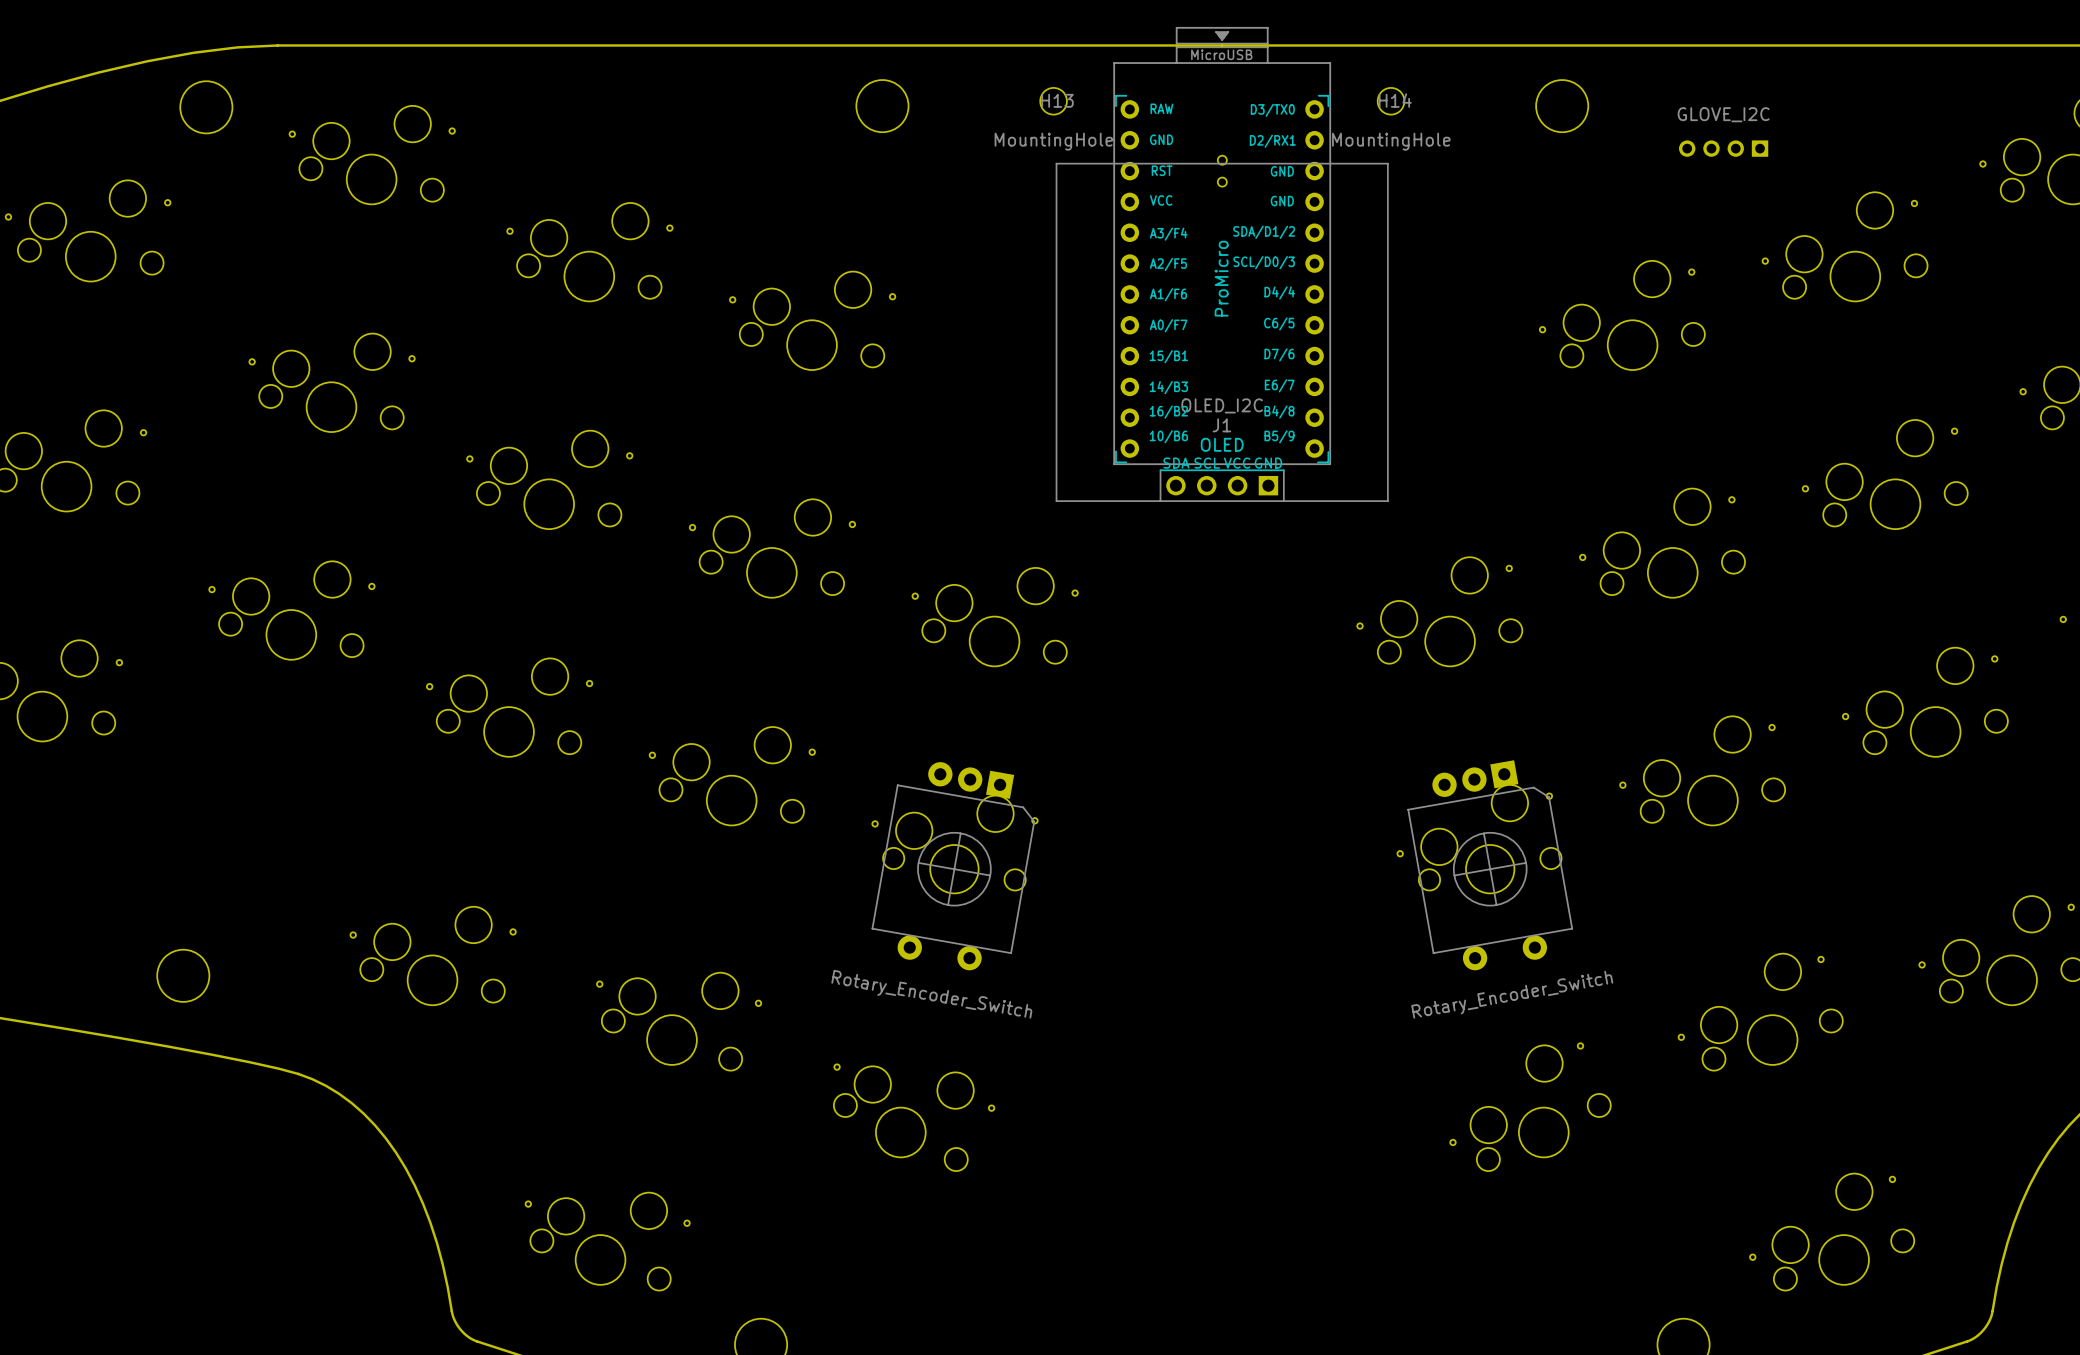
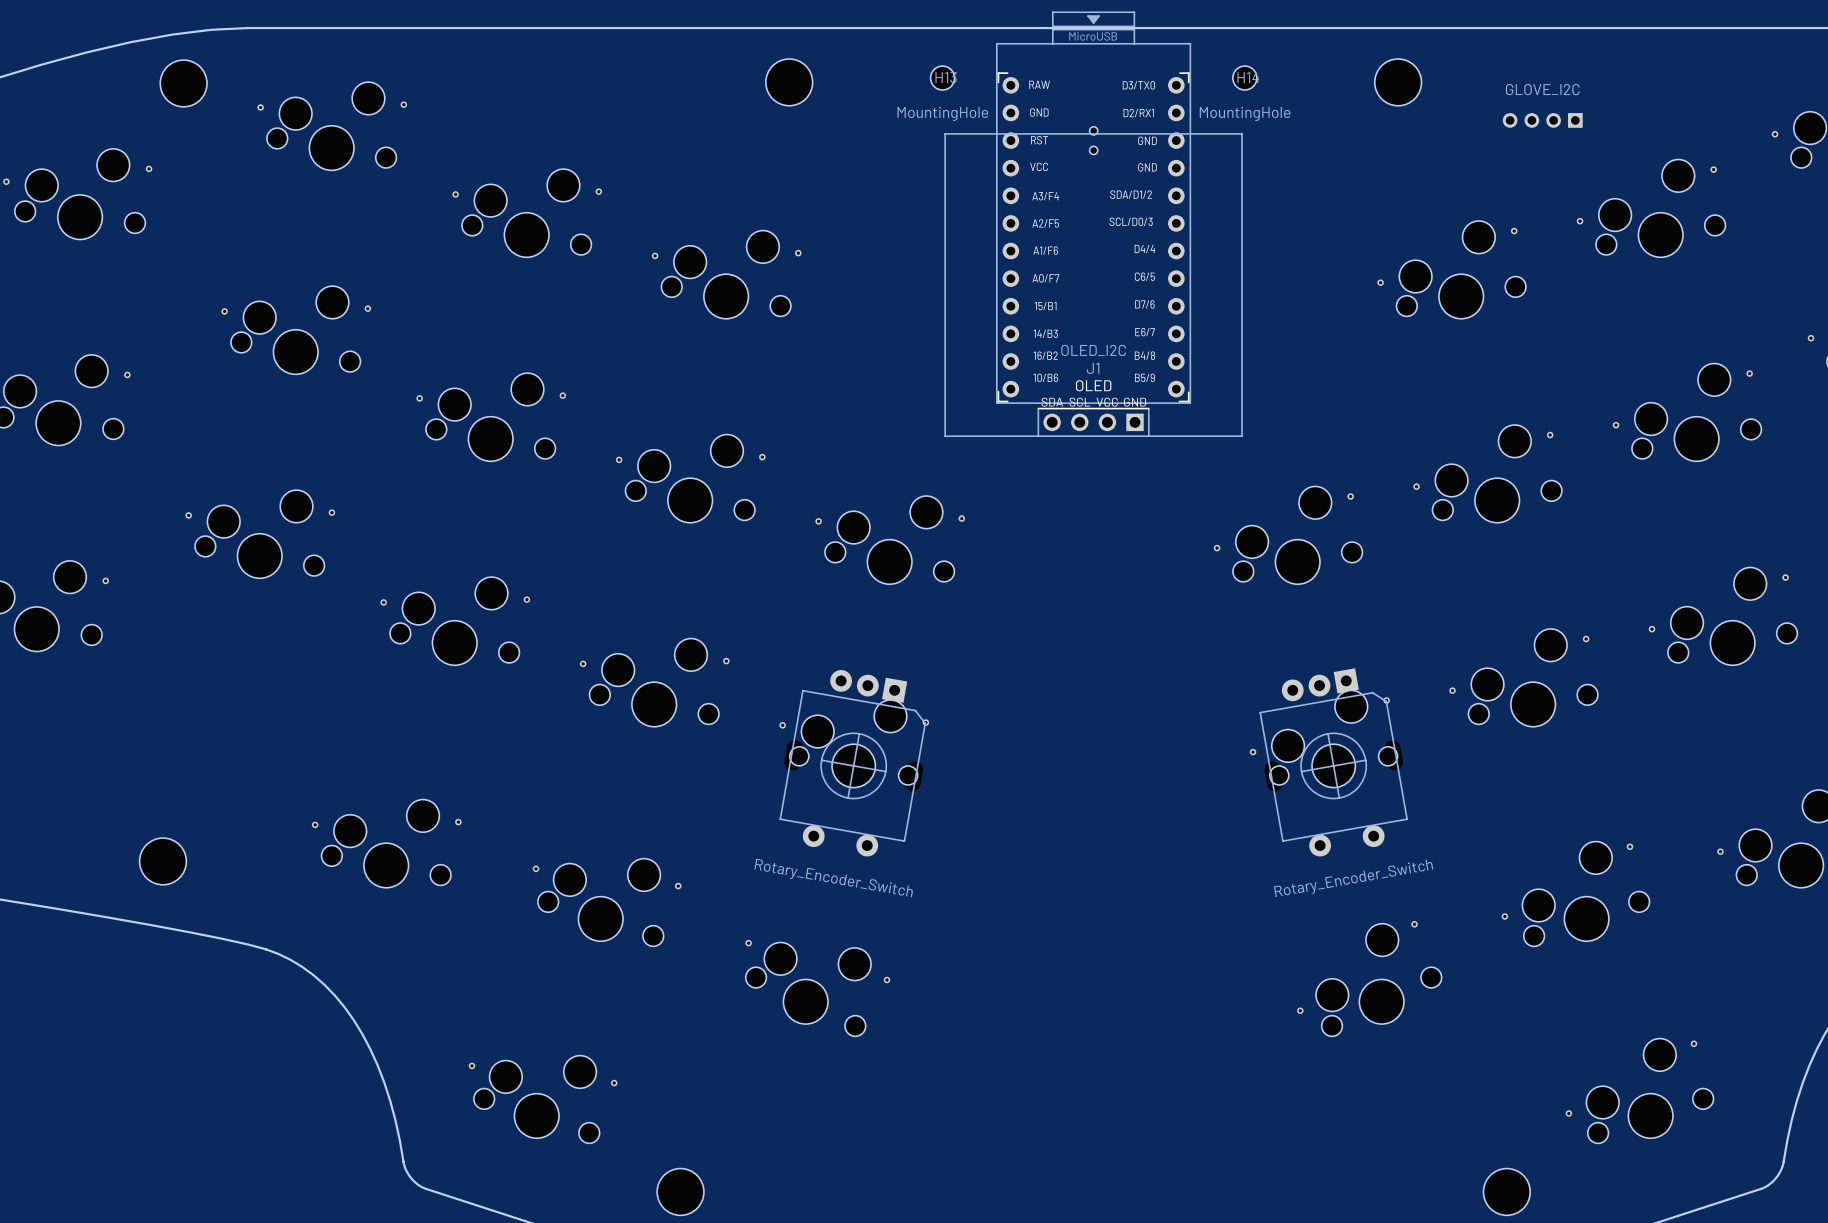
text: ProMicro (1221, 278) -> none

